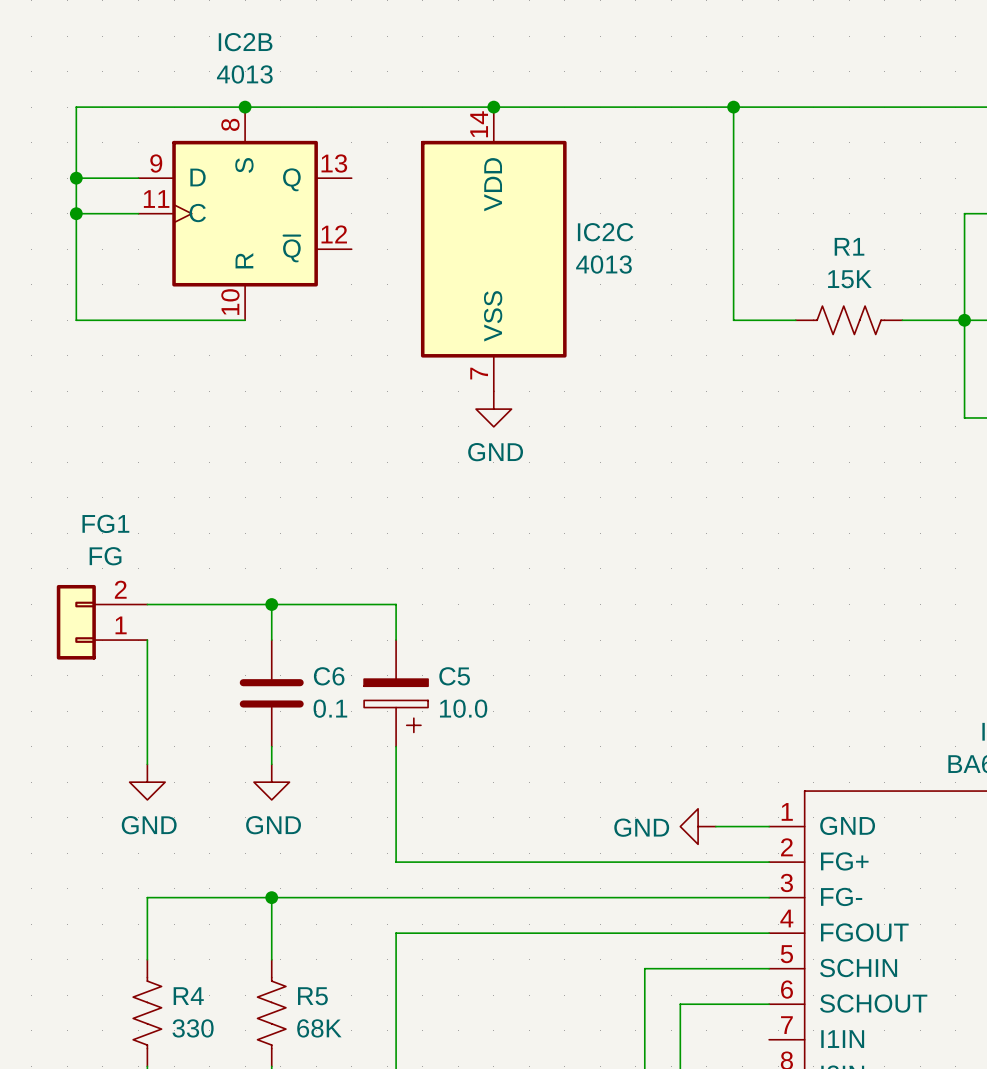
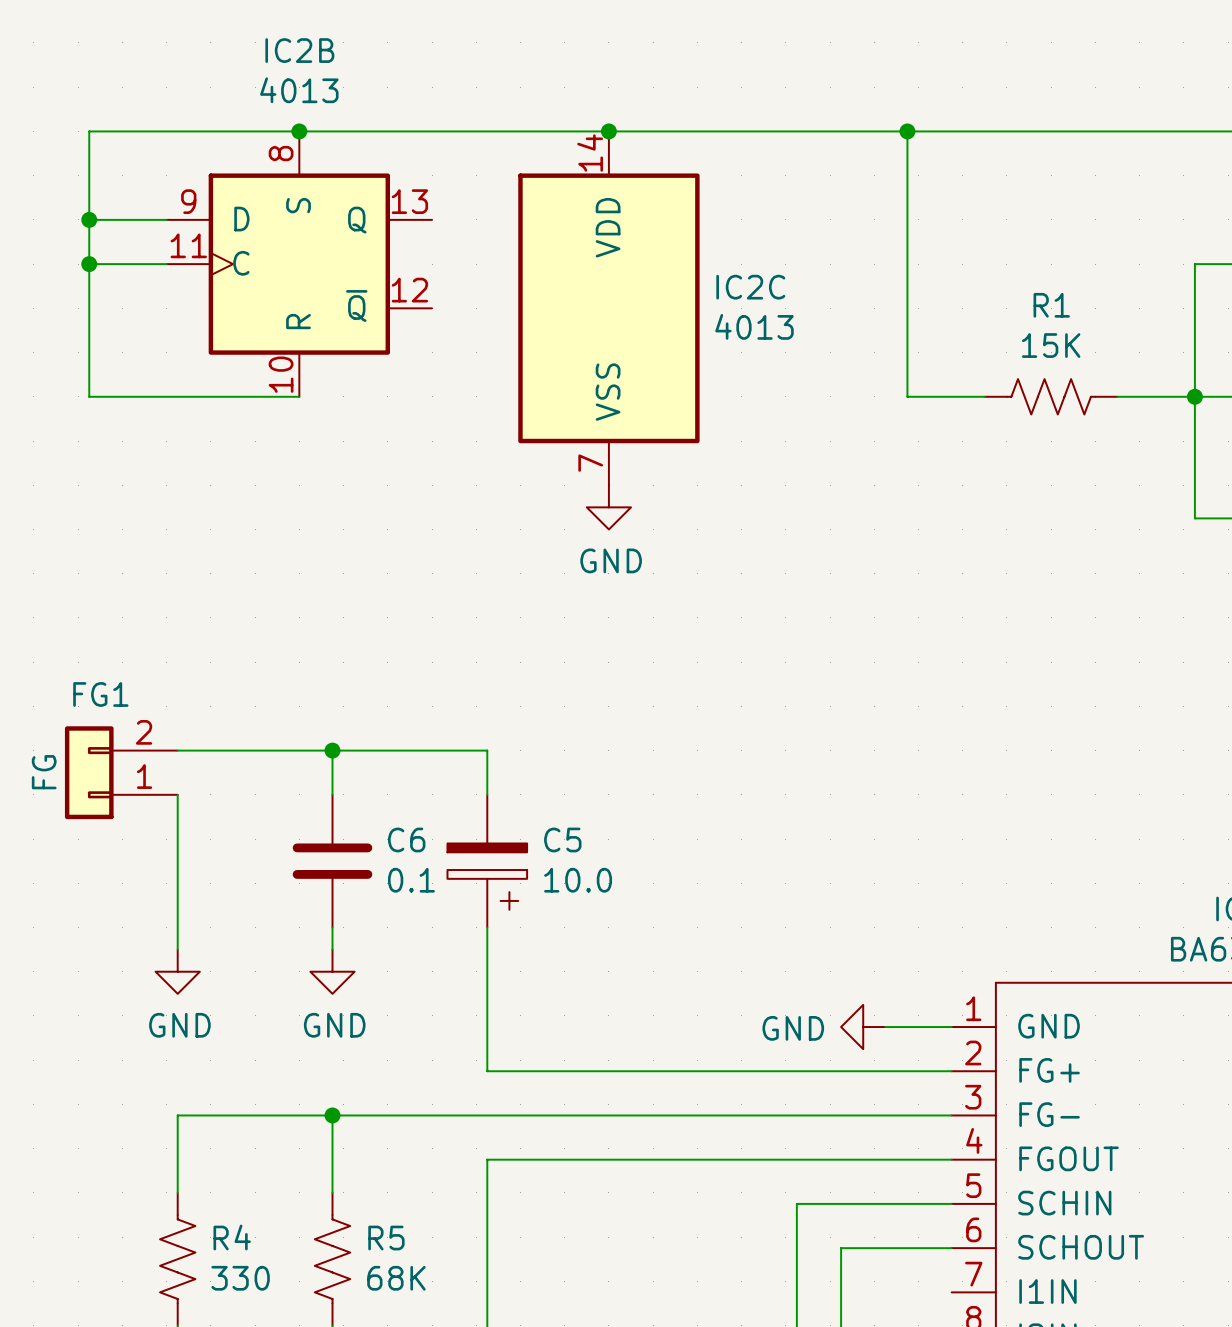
FG1 name position: FG1 (105, 523) -> FG1 (100, 694)
FG1 value rotation: 0° (105, 556) -> 90° counterclockwise (44, 772)
FG1 value position: FG (105, 556) -> FG (44, 772)

